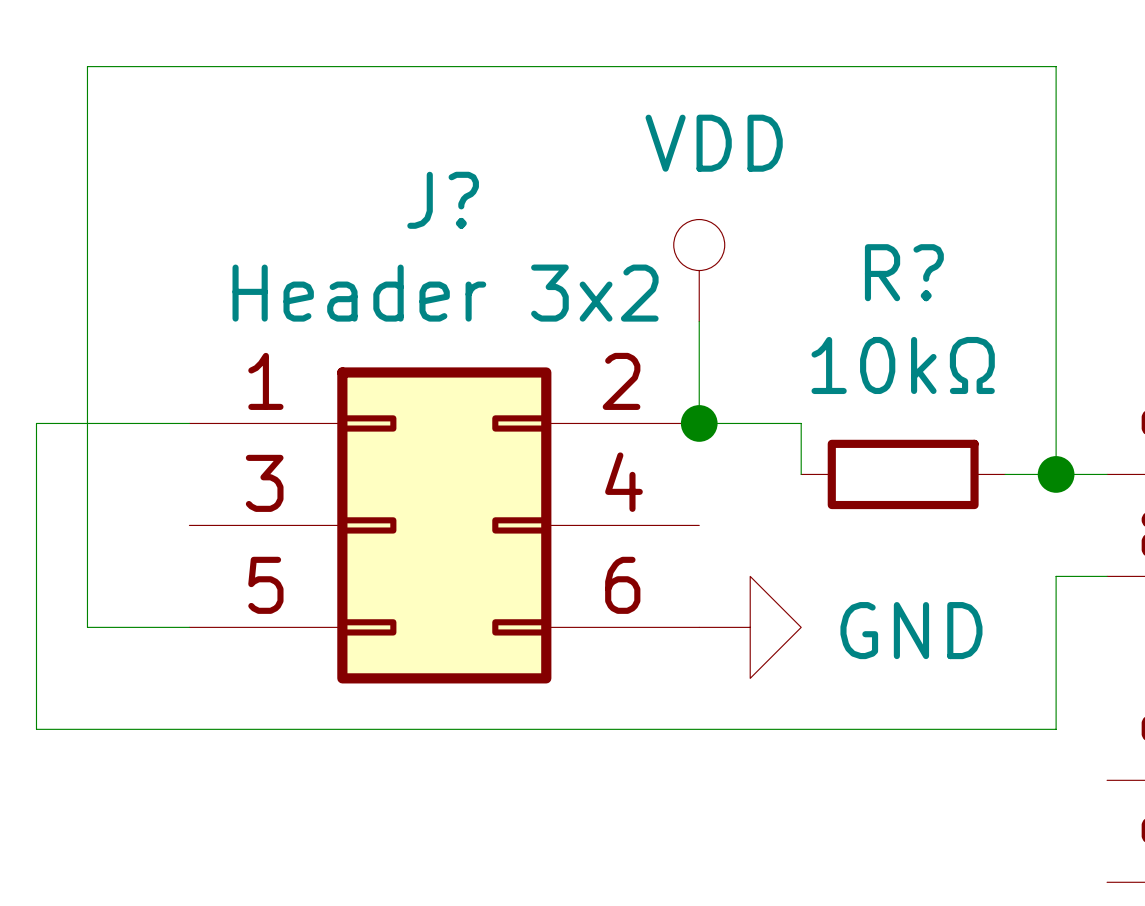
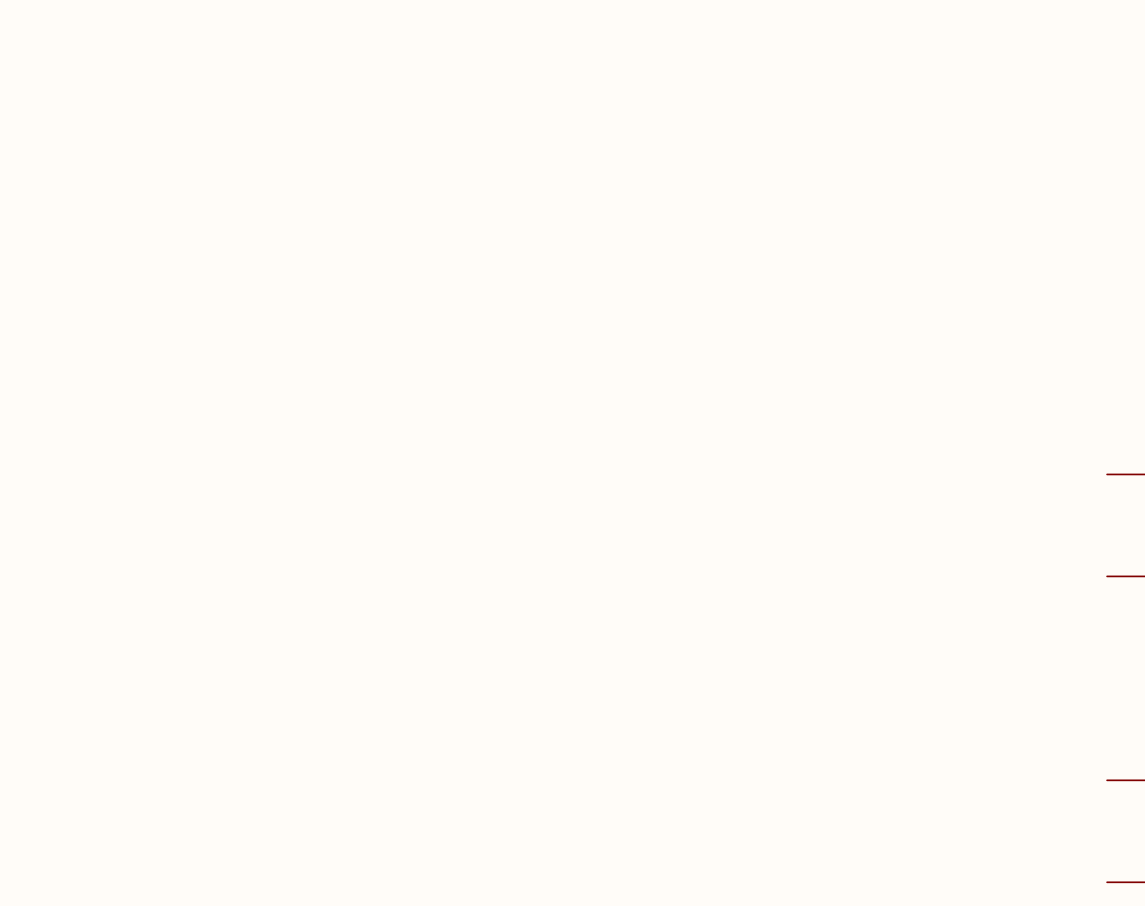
power symbol: VDD (699, 270) -> none
wire: (699, 321) (699, 423) (801, 423) (801, 474) -> none
wire: (189, 423) (36, 423) (36, 729) (1056, 729) (1056, 576) (1107, 576) -> none
junction: (699, 423) -> none
R?: 10kΩ (903, 474) -> none
wire: (1005, 474) (1107, 474) -> none
wire: (1056, 474) (1056, 66) (87, 66) (87, 627) (189, 627) -> none
junction: (1056, 474) -> none
J?: Header 3x2 (444, 525) -> none
power symbol: GND (750, 627) -> none

